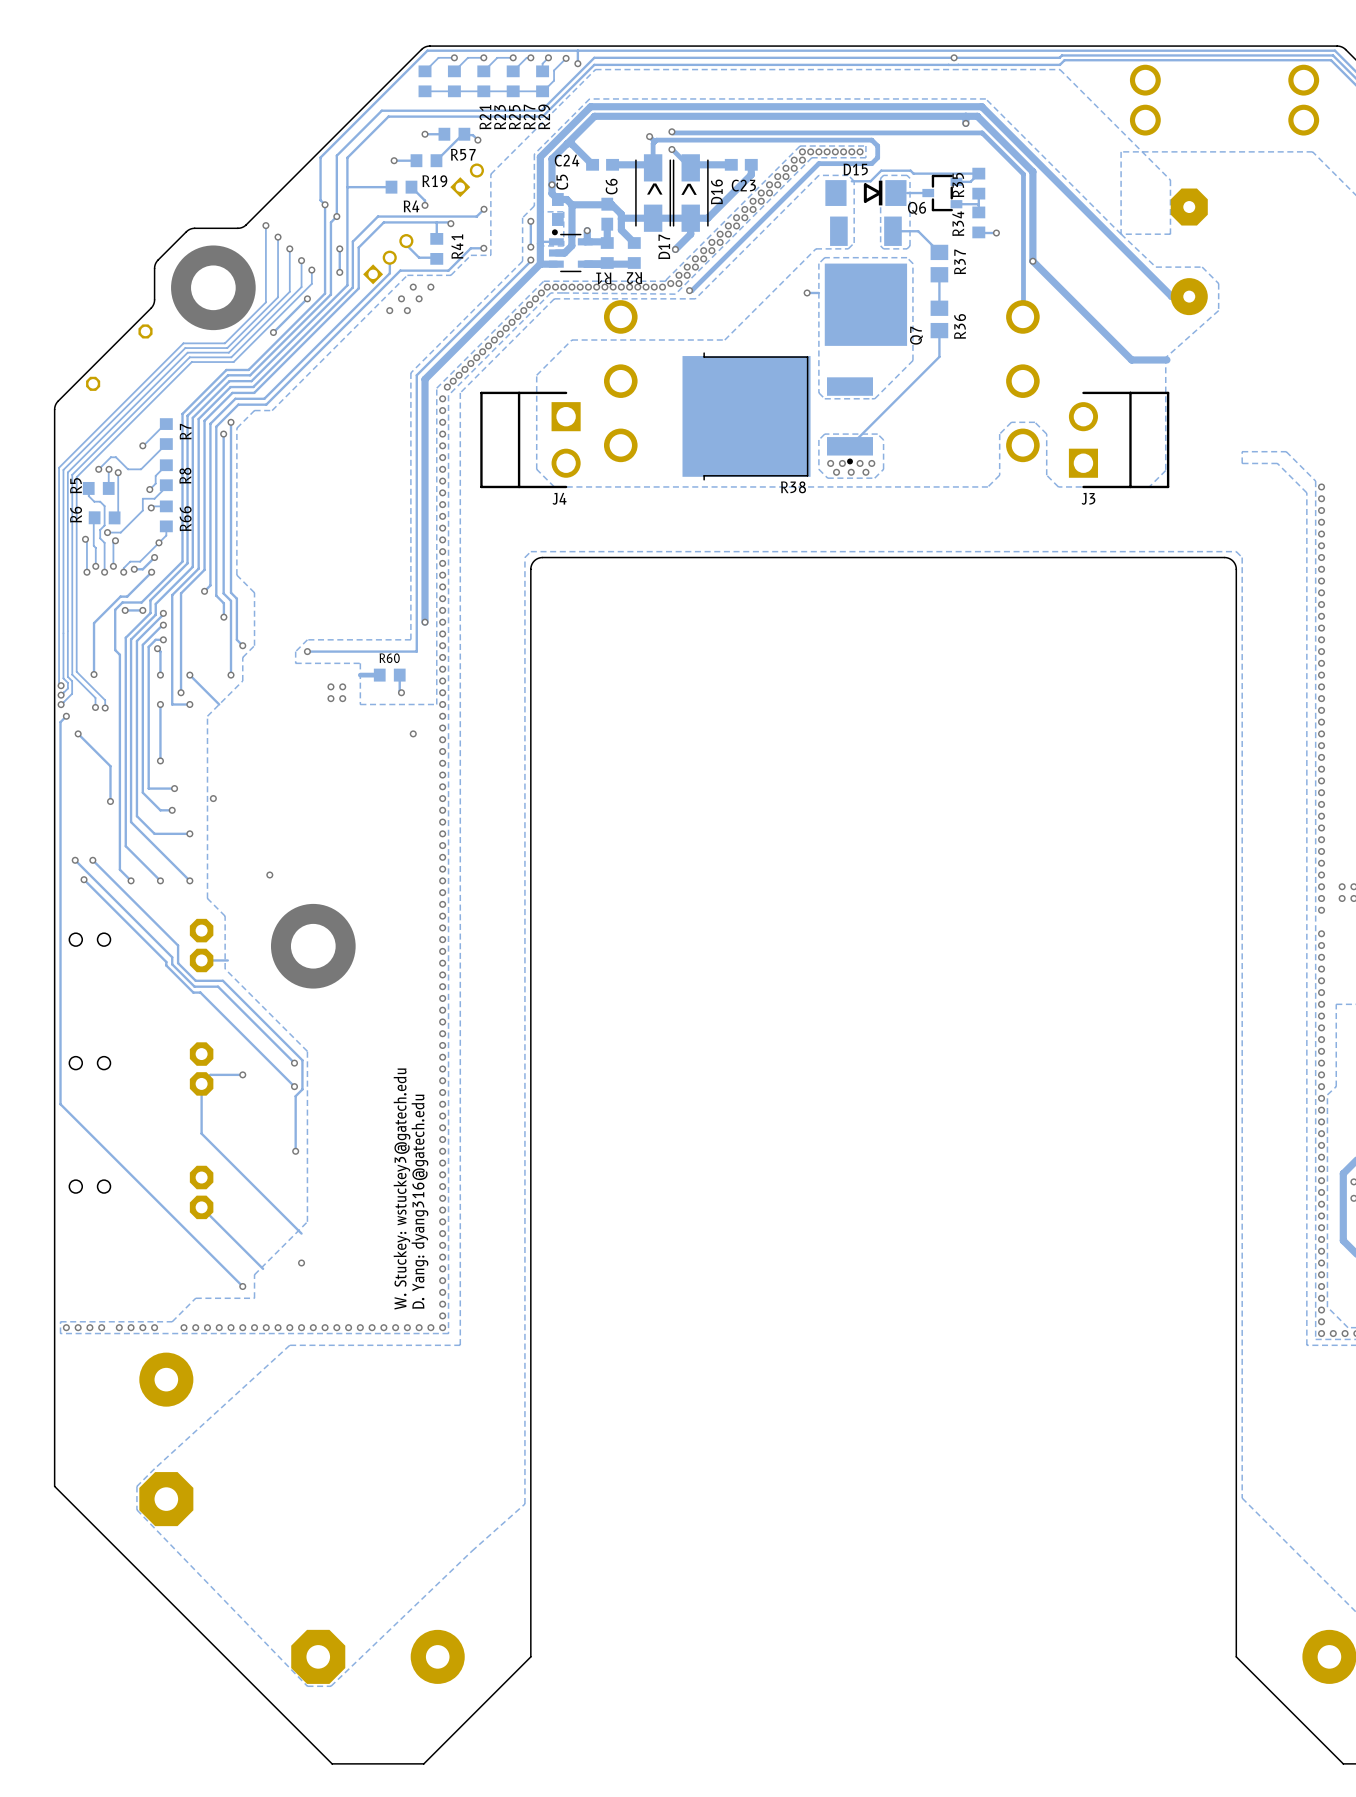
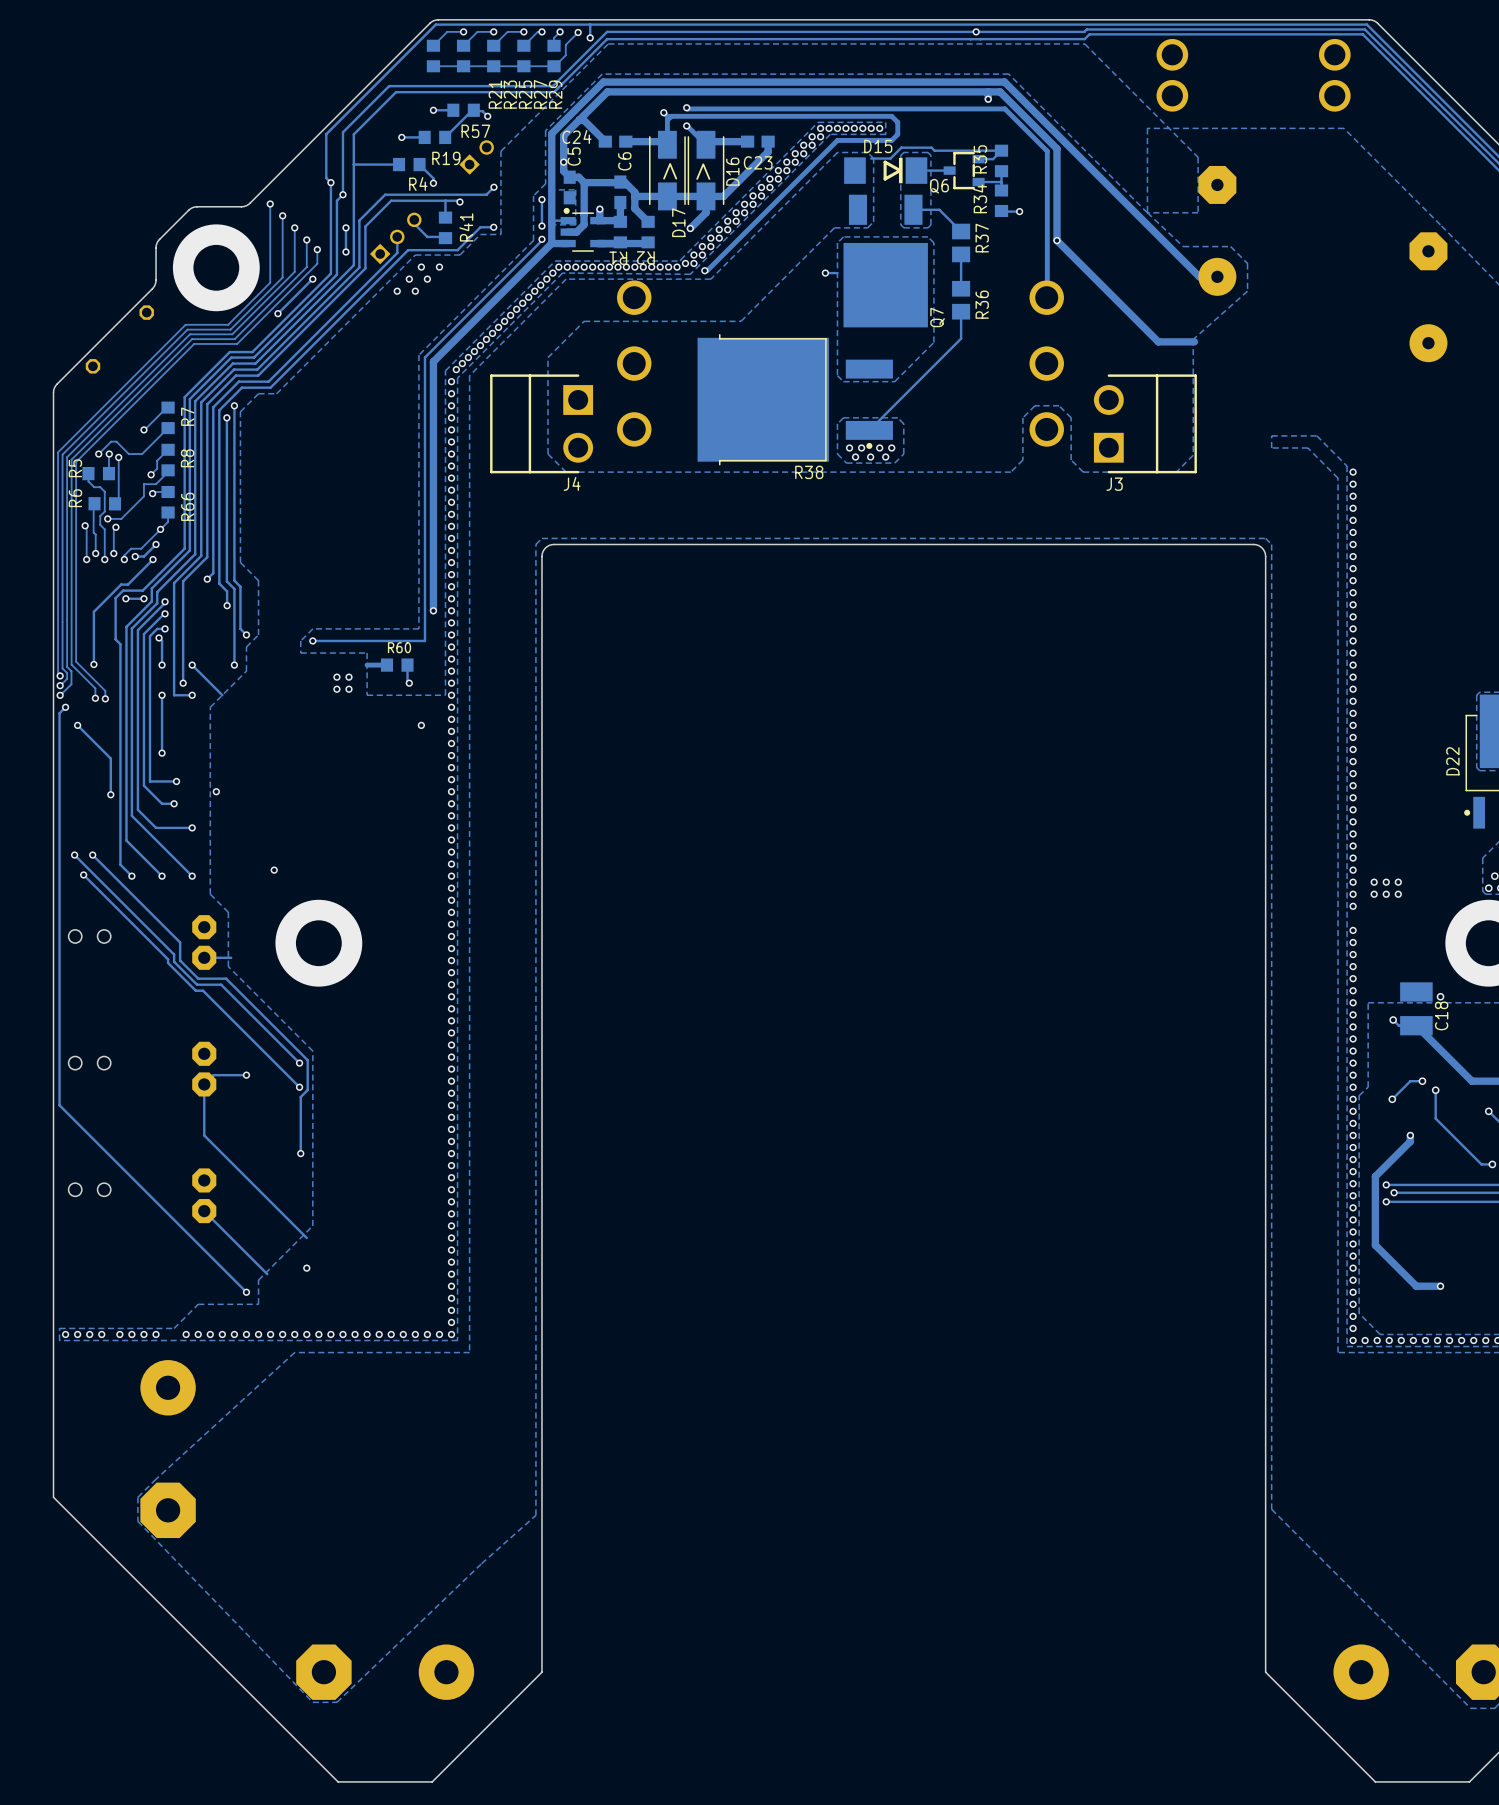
text: W. Stuckey: wstuckey3@gatech.edu (402, 1189) -> none
text: D. Yang: dyang316@gatech.edu (419, 1201) -> none

